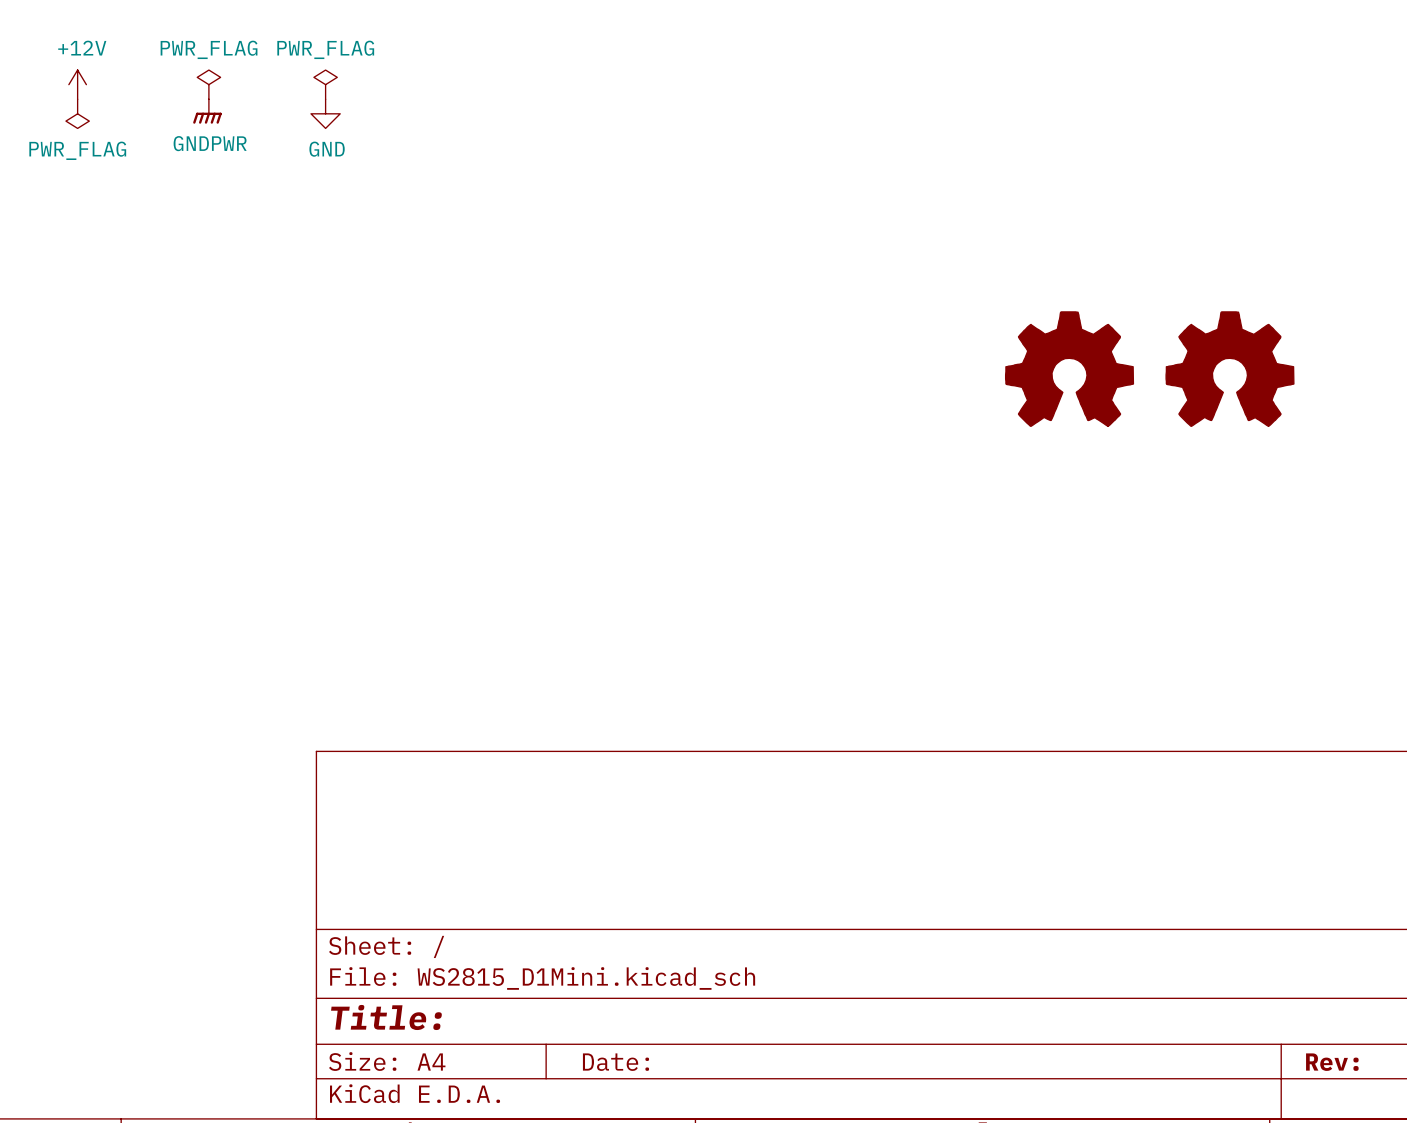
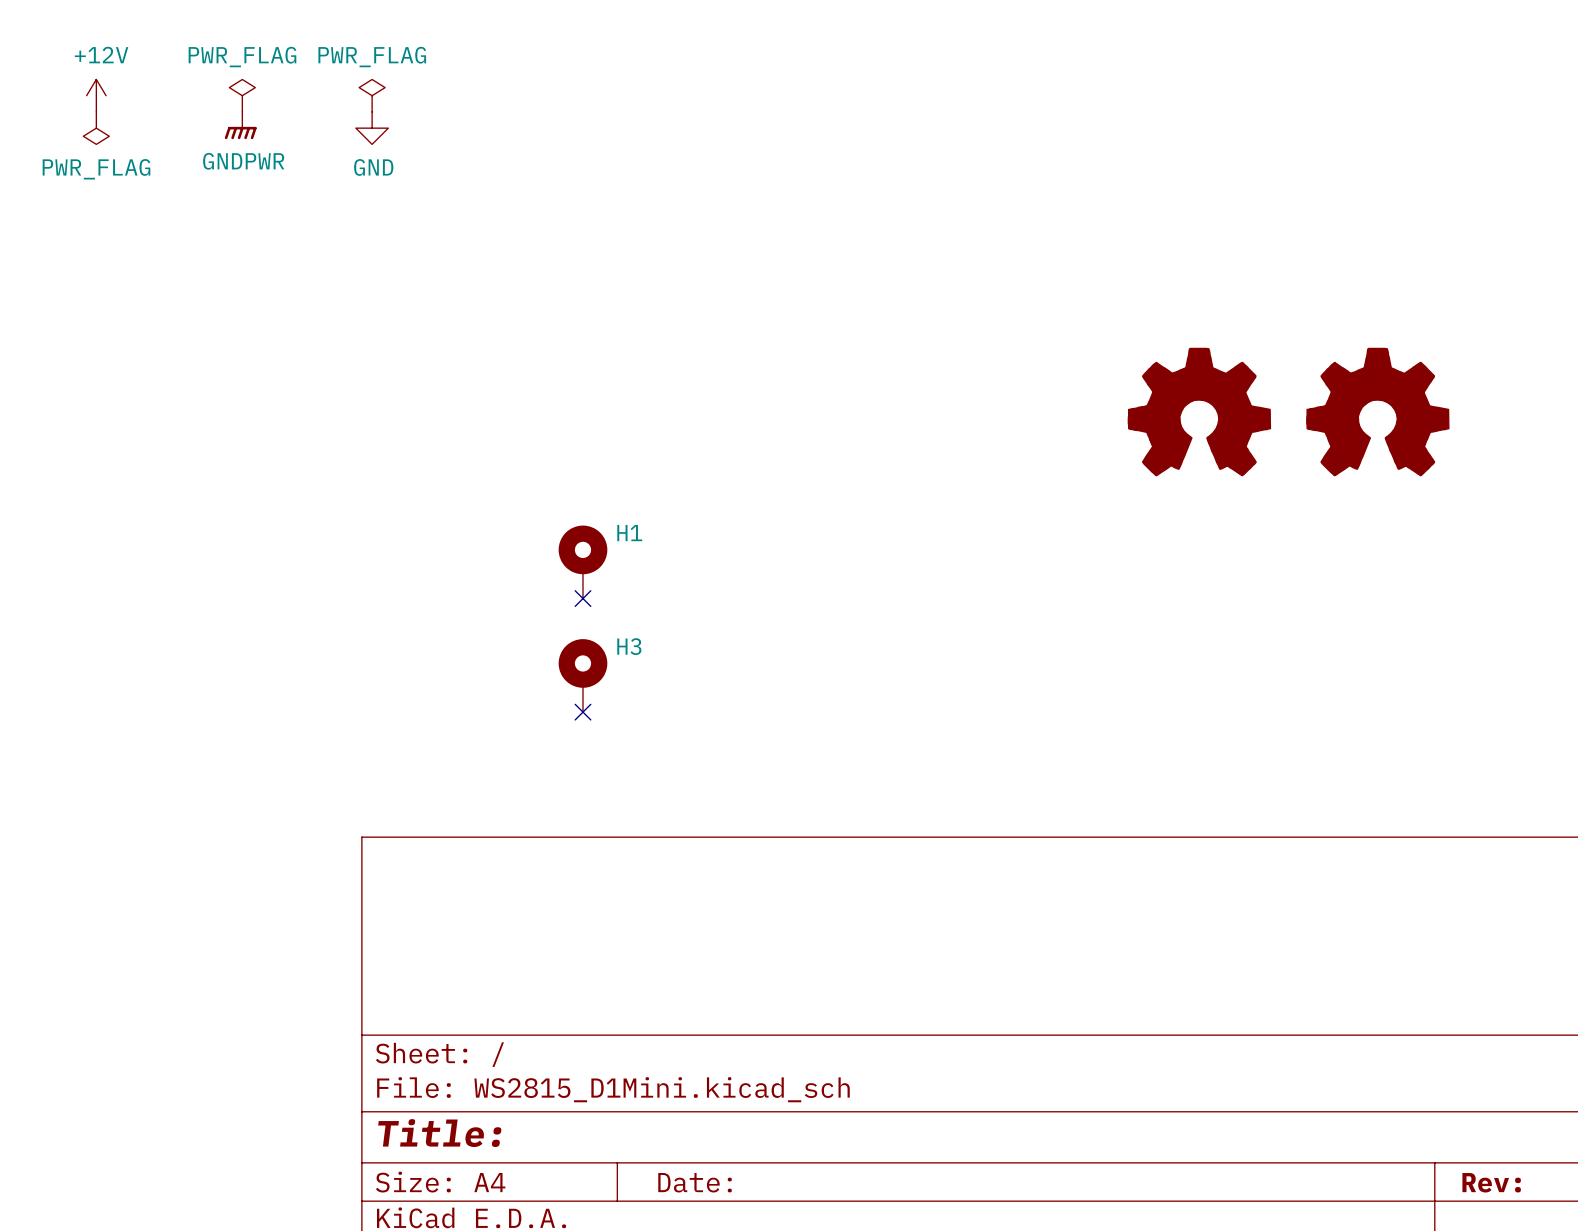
H1: none -> (582, 562)
no-connect mark: none -> (582, 598)
H3: none -> (582, 675)
no-connect mark: none -> (582, 712)

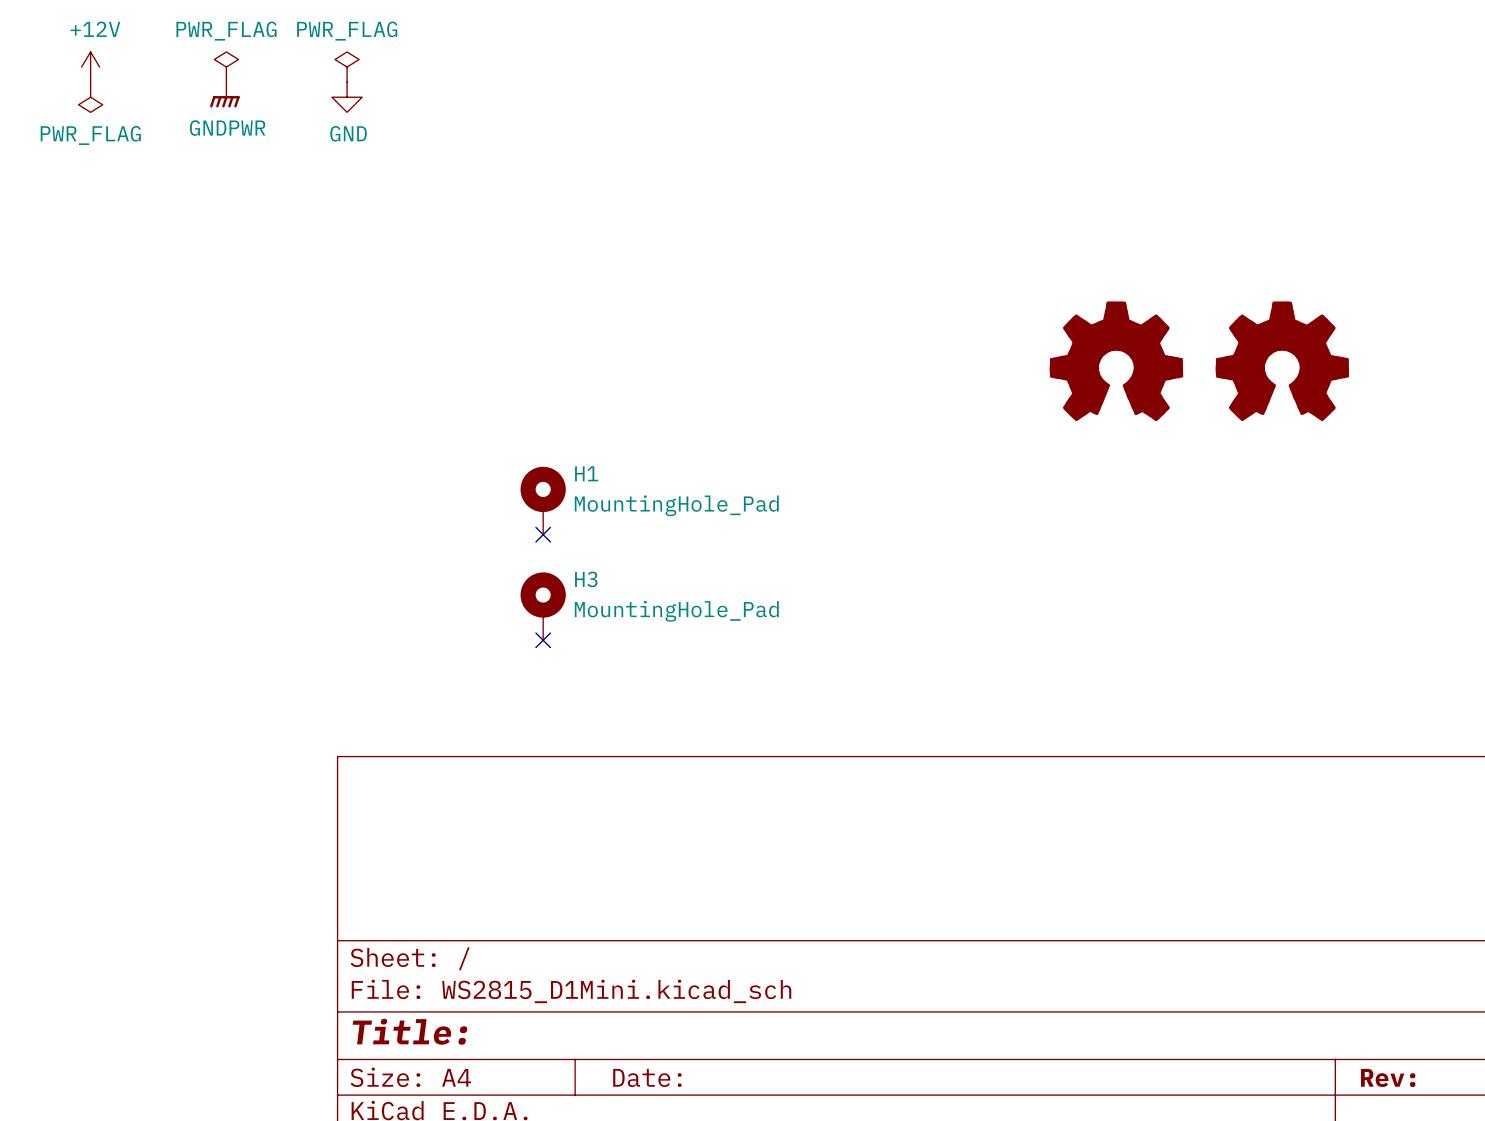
H1 value: none -> MountingHole_Pad (676, 505)
H3 value: none -> MountingHole_Pad (676, 611)

